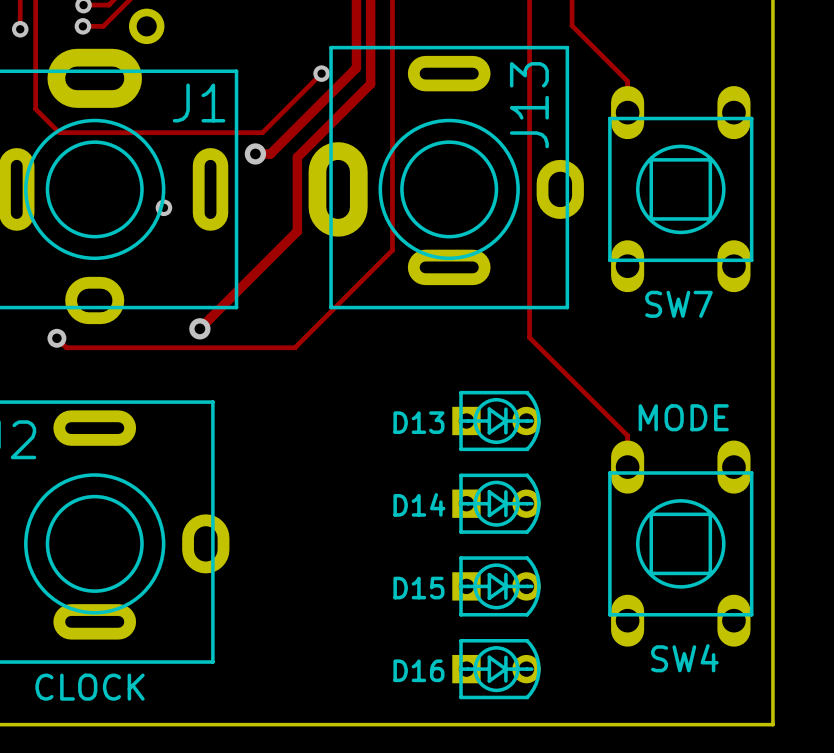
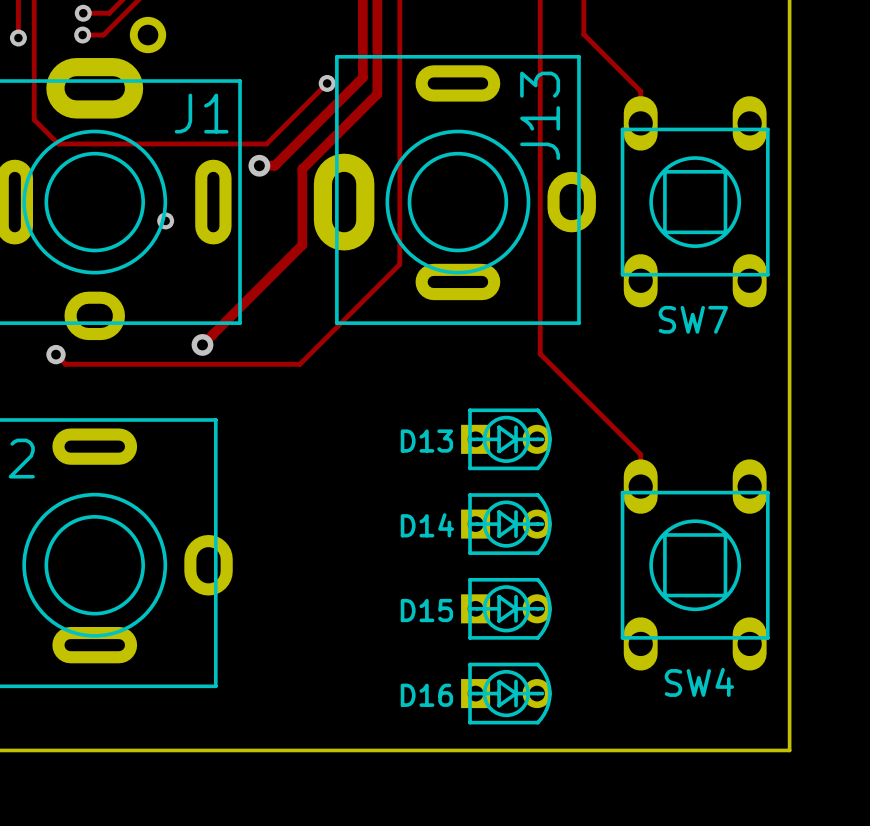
text: MODE (683, 417) -> none
text: CLOCK (90, 687) -> none

